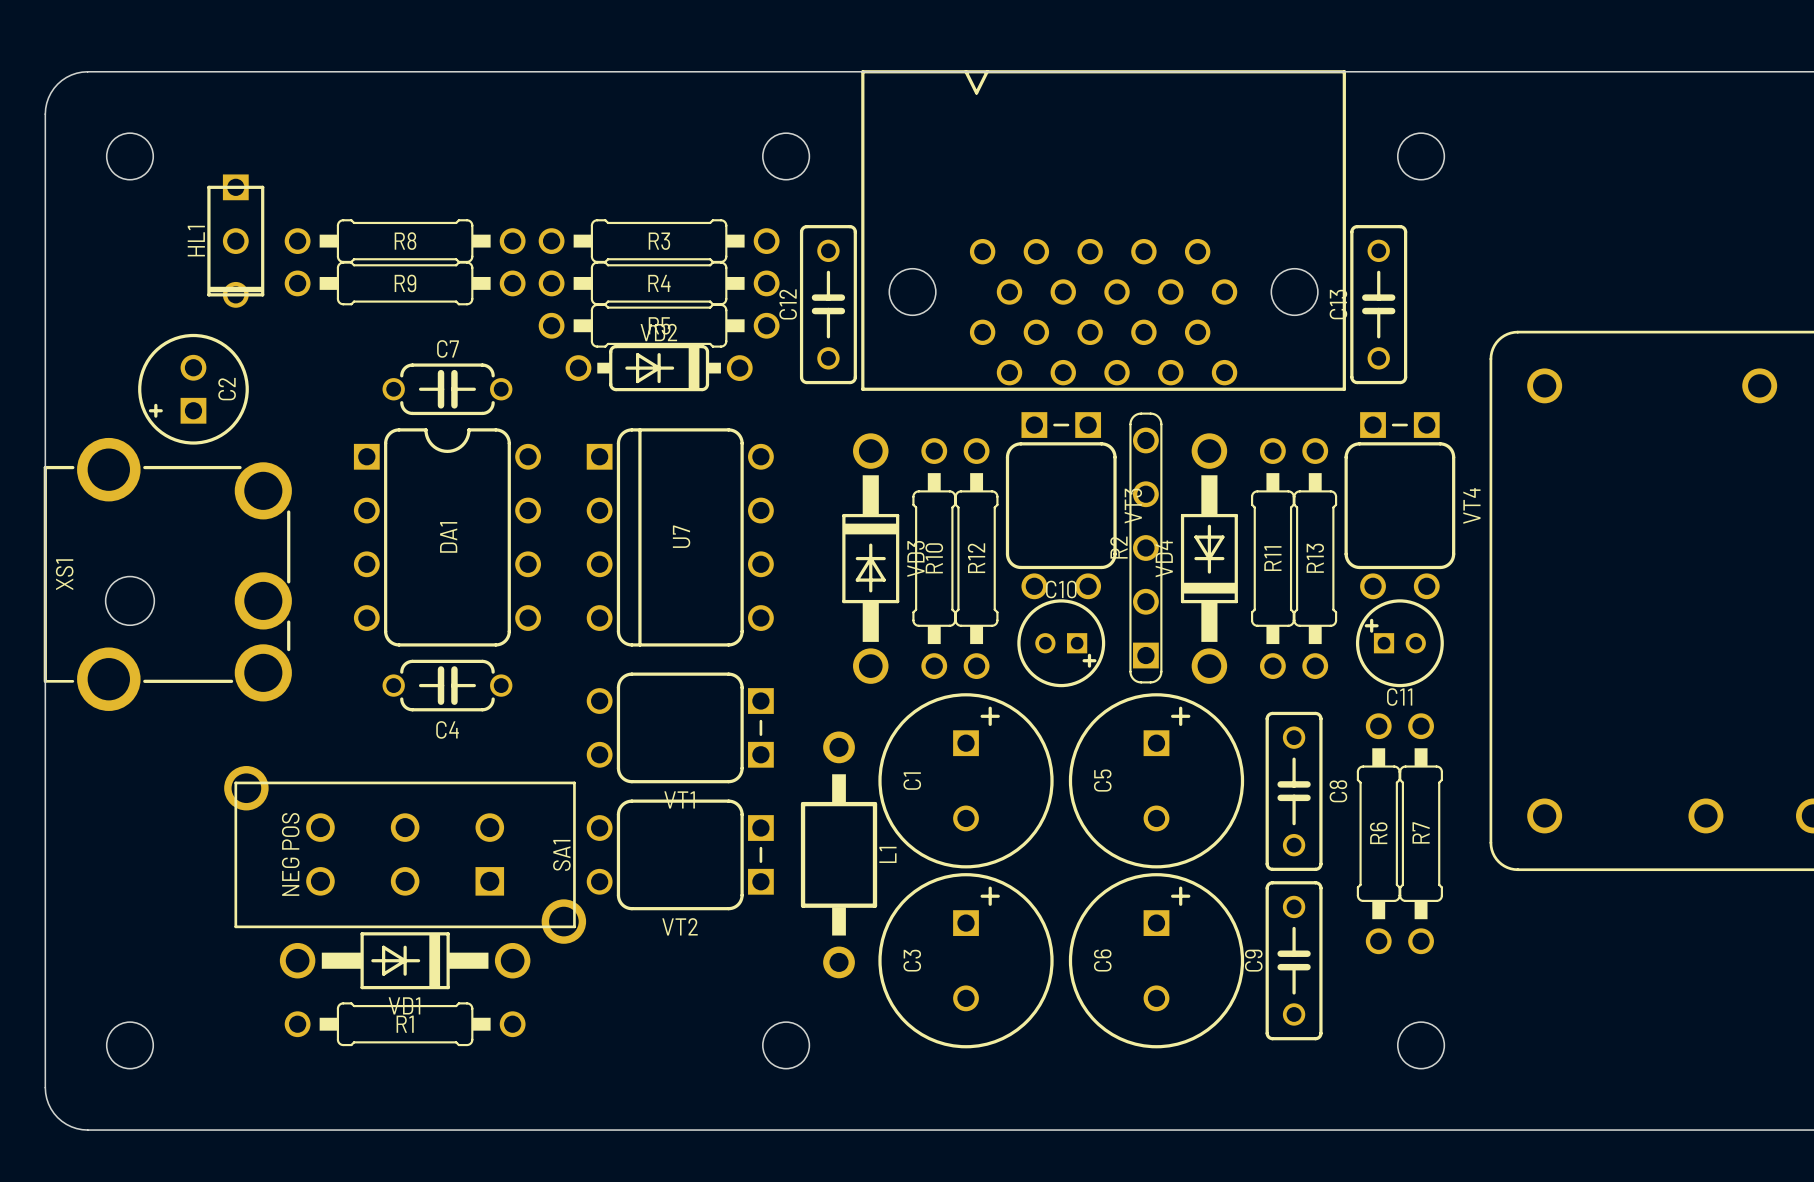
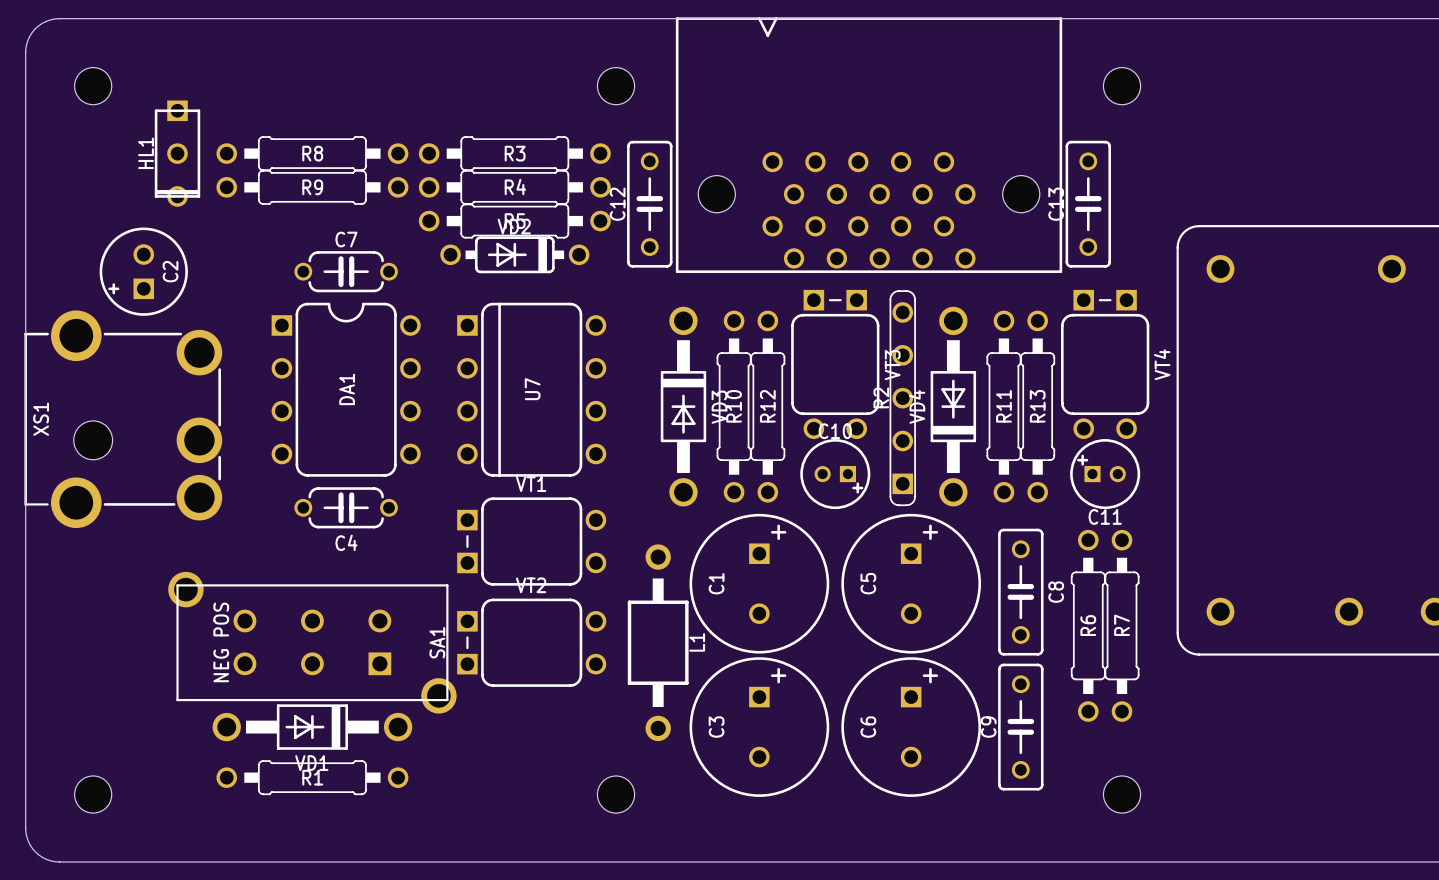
VT1 rotation: 0° (680, 727) -> 180° (531, 541)
VT2 rotation: 0° (680, 854) -> 180° (531, 642)

